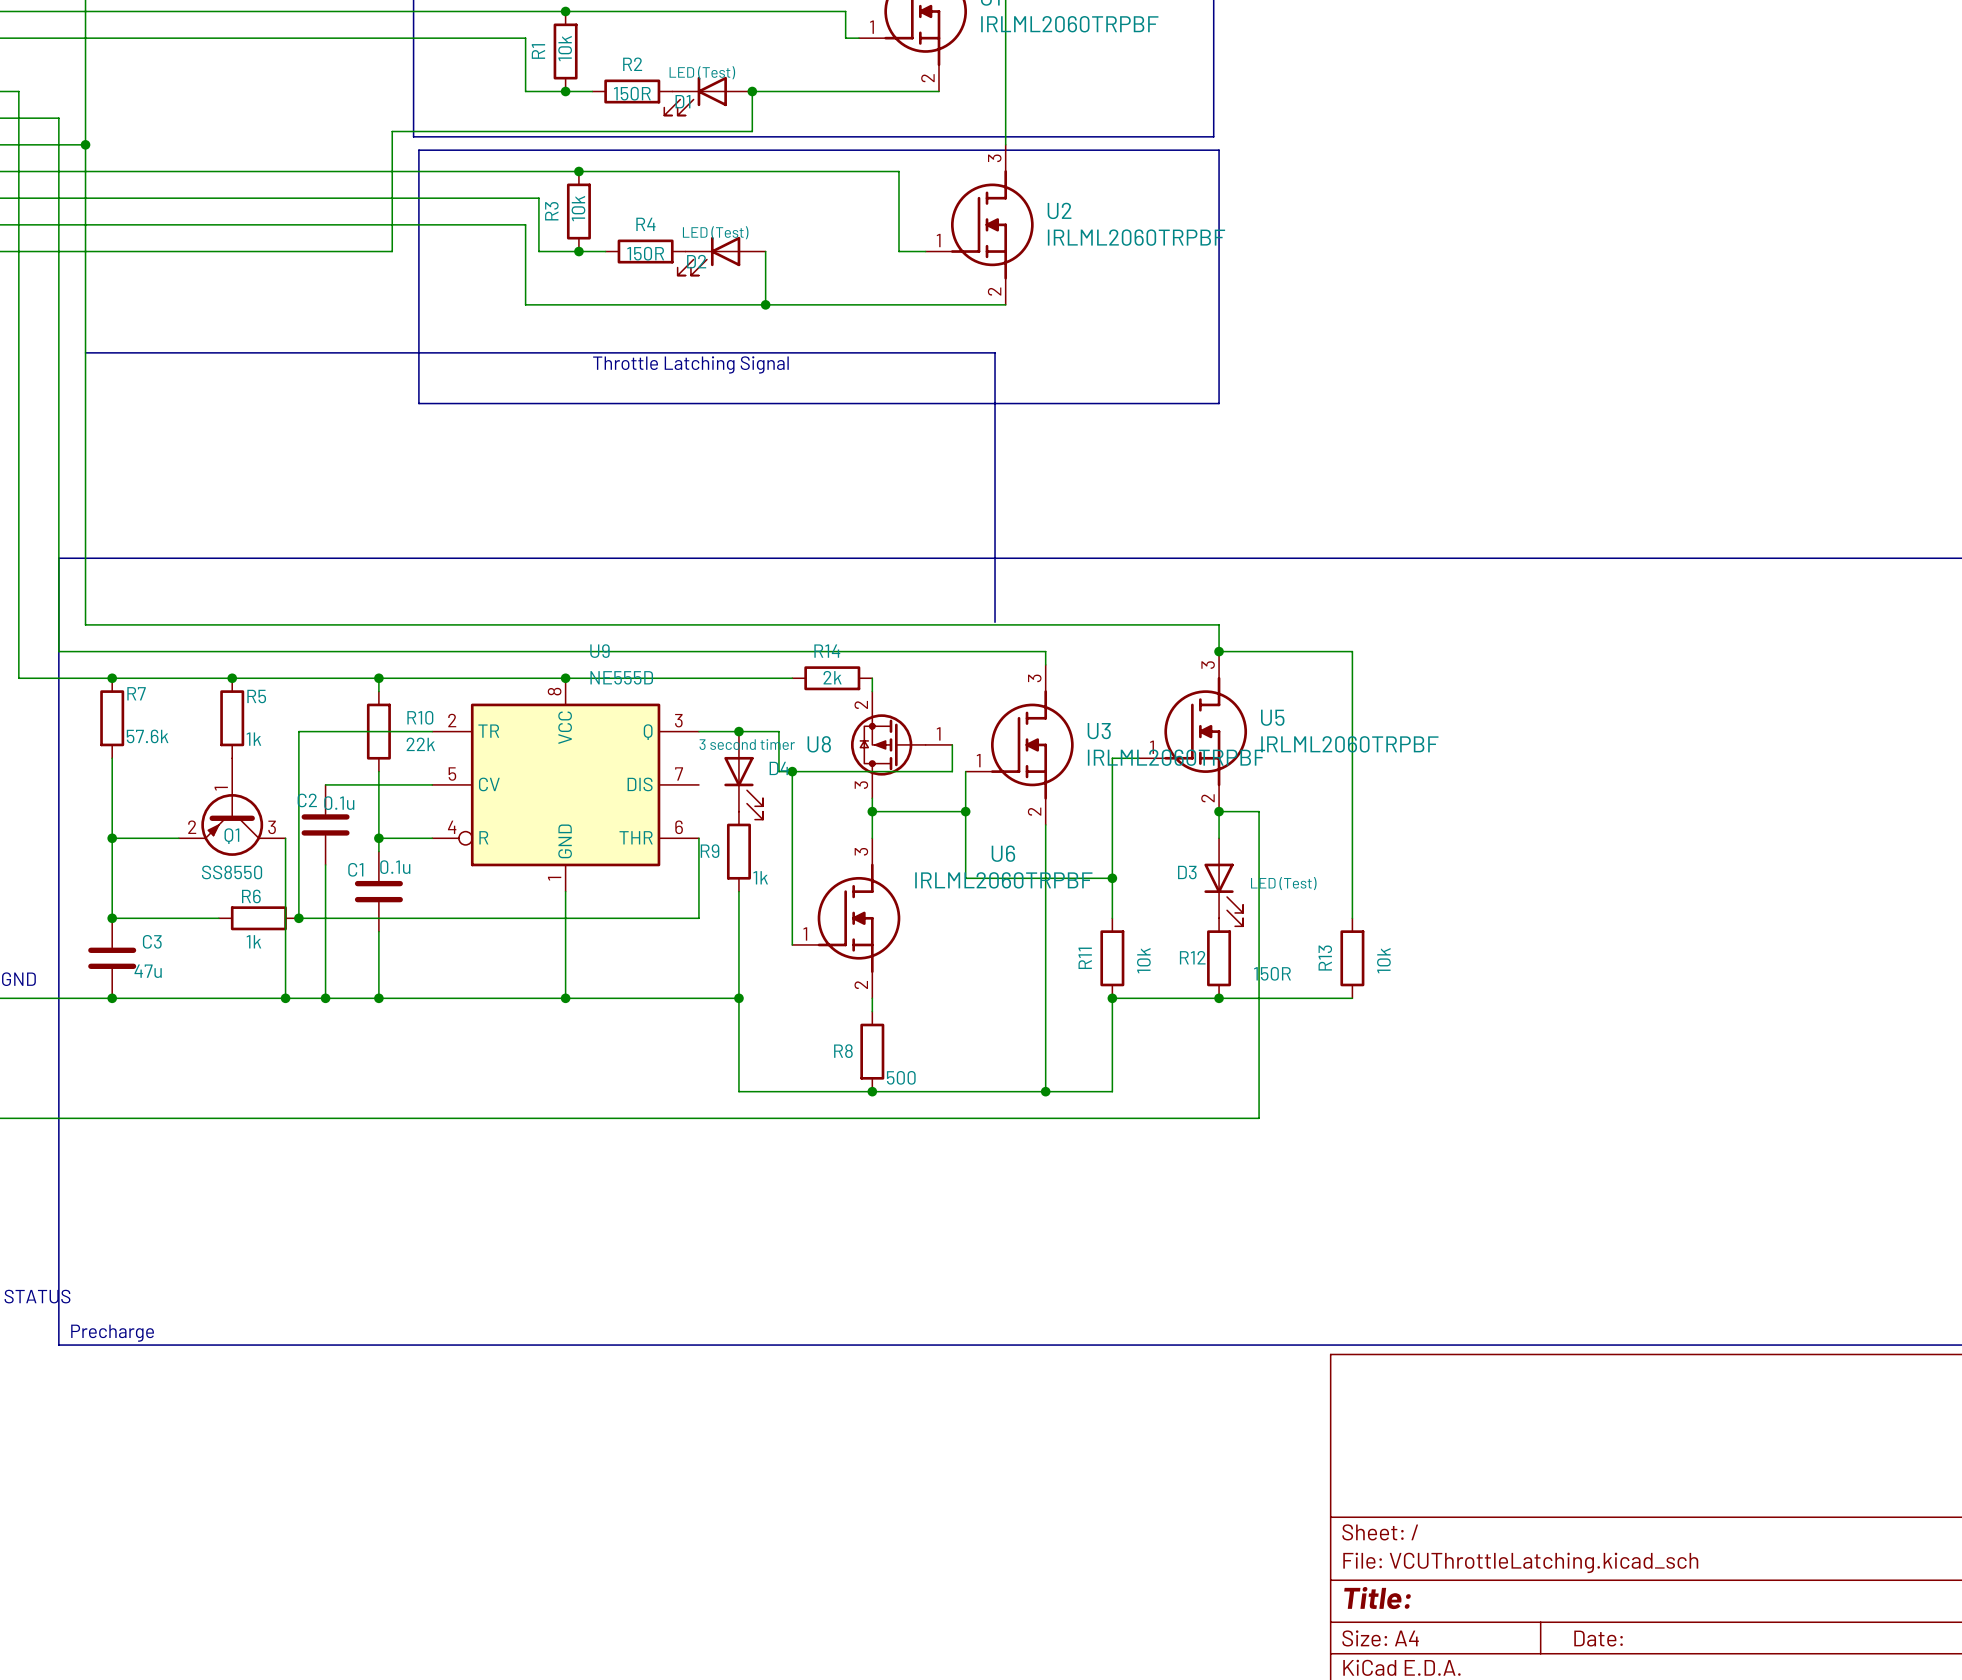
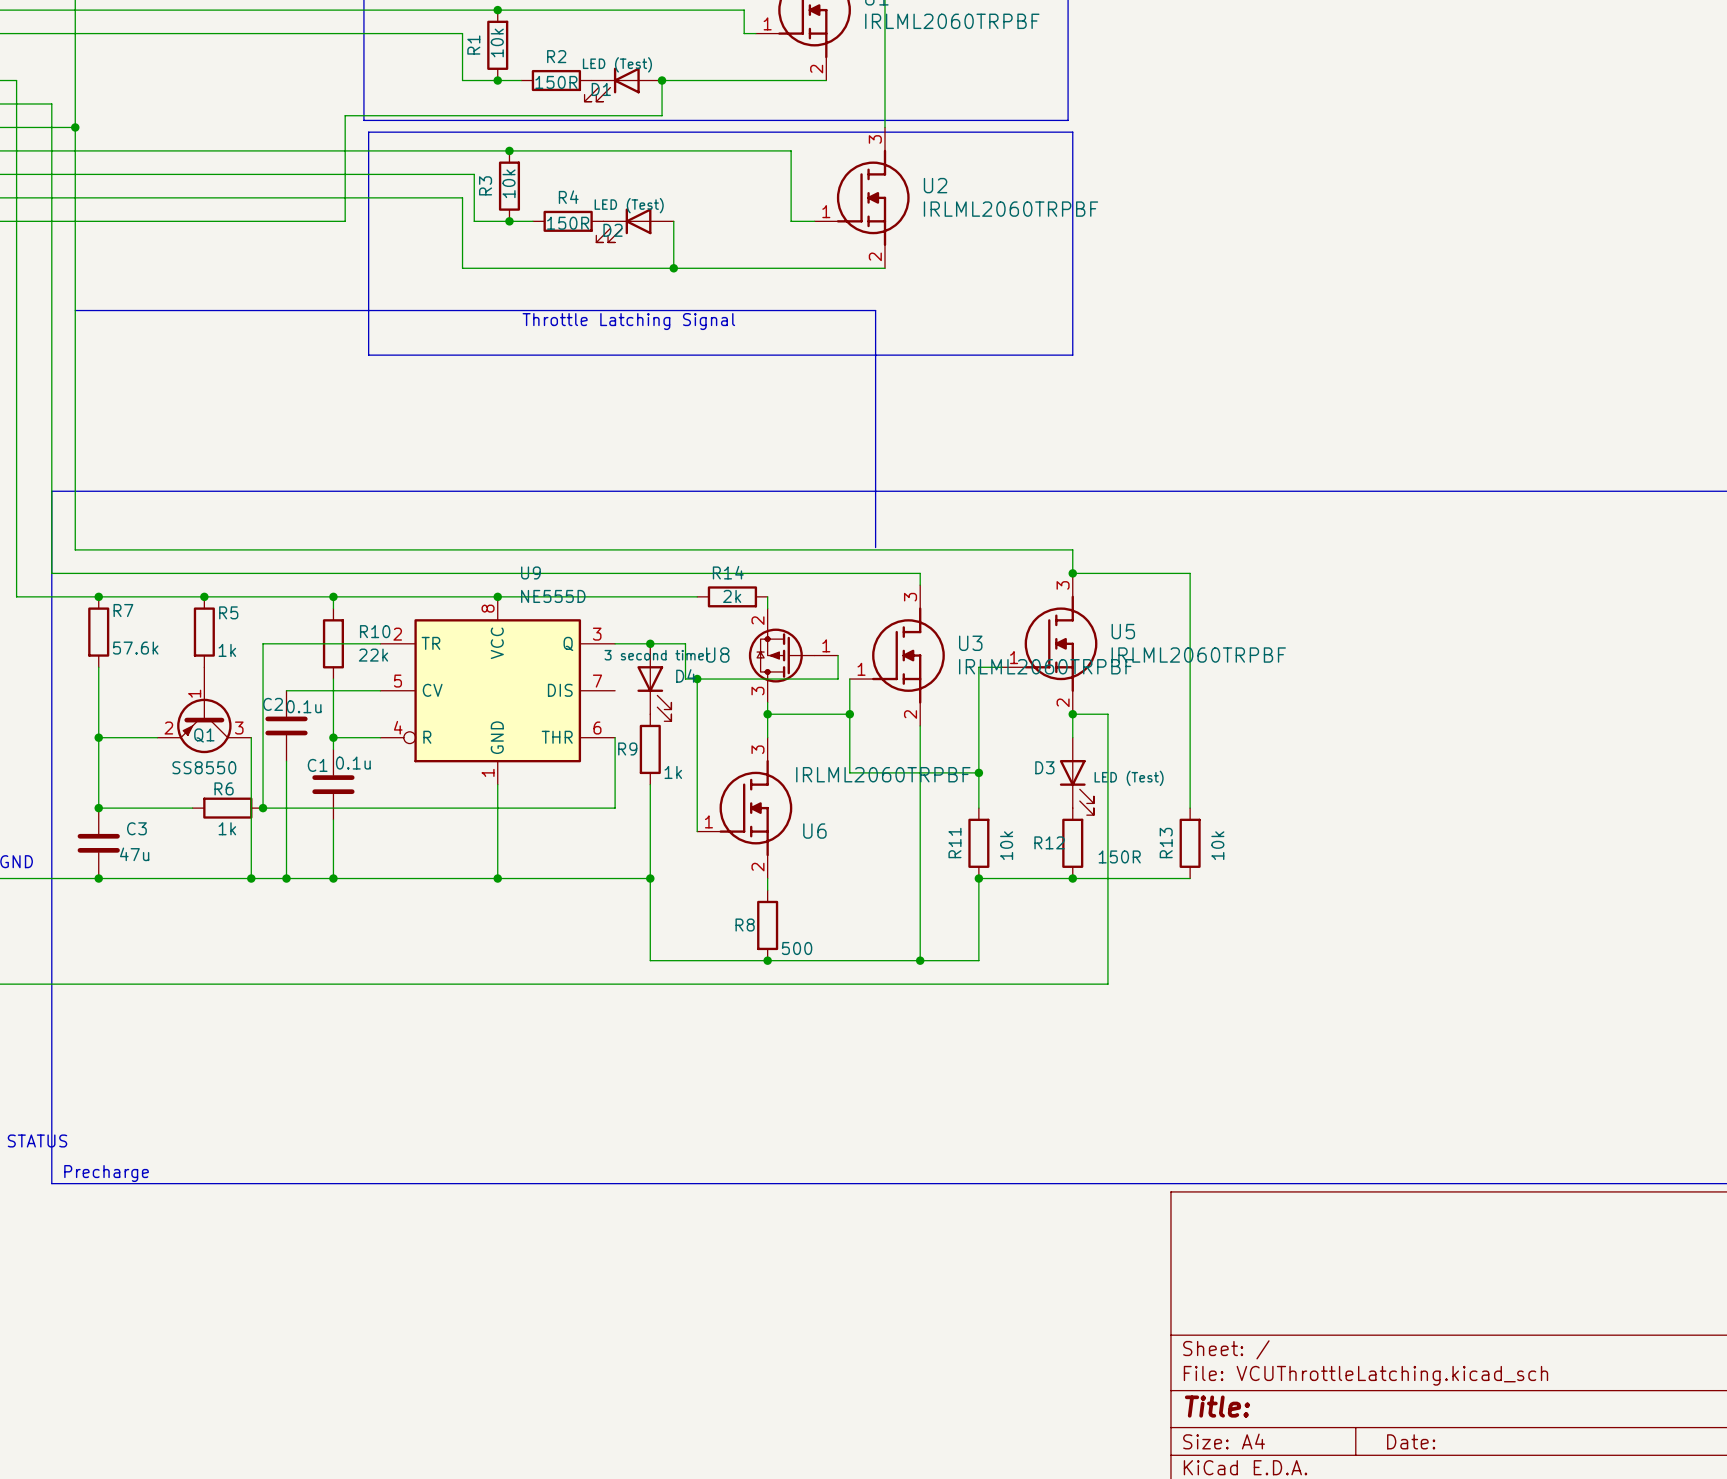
U6 name position: U6 (1003, 853) -> U6 (814, 831)

